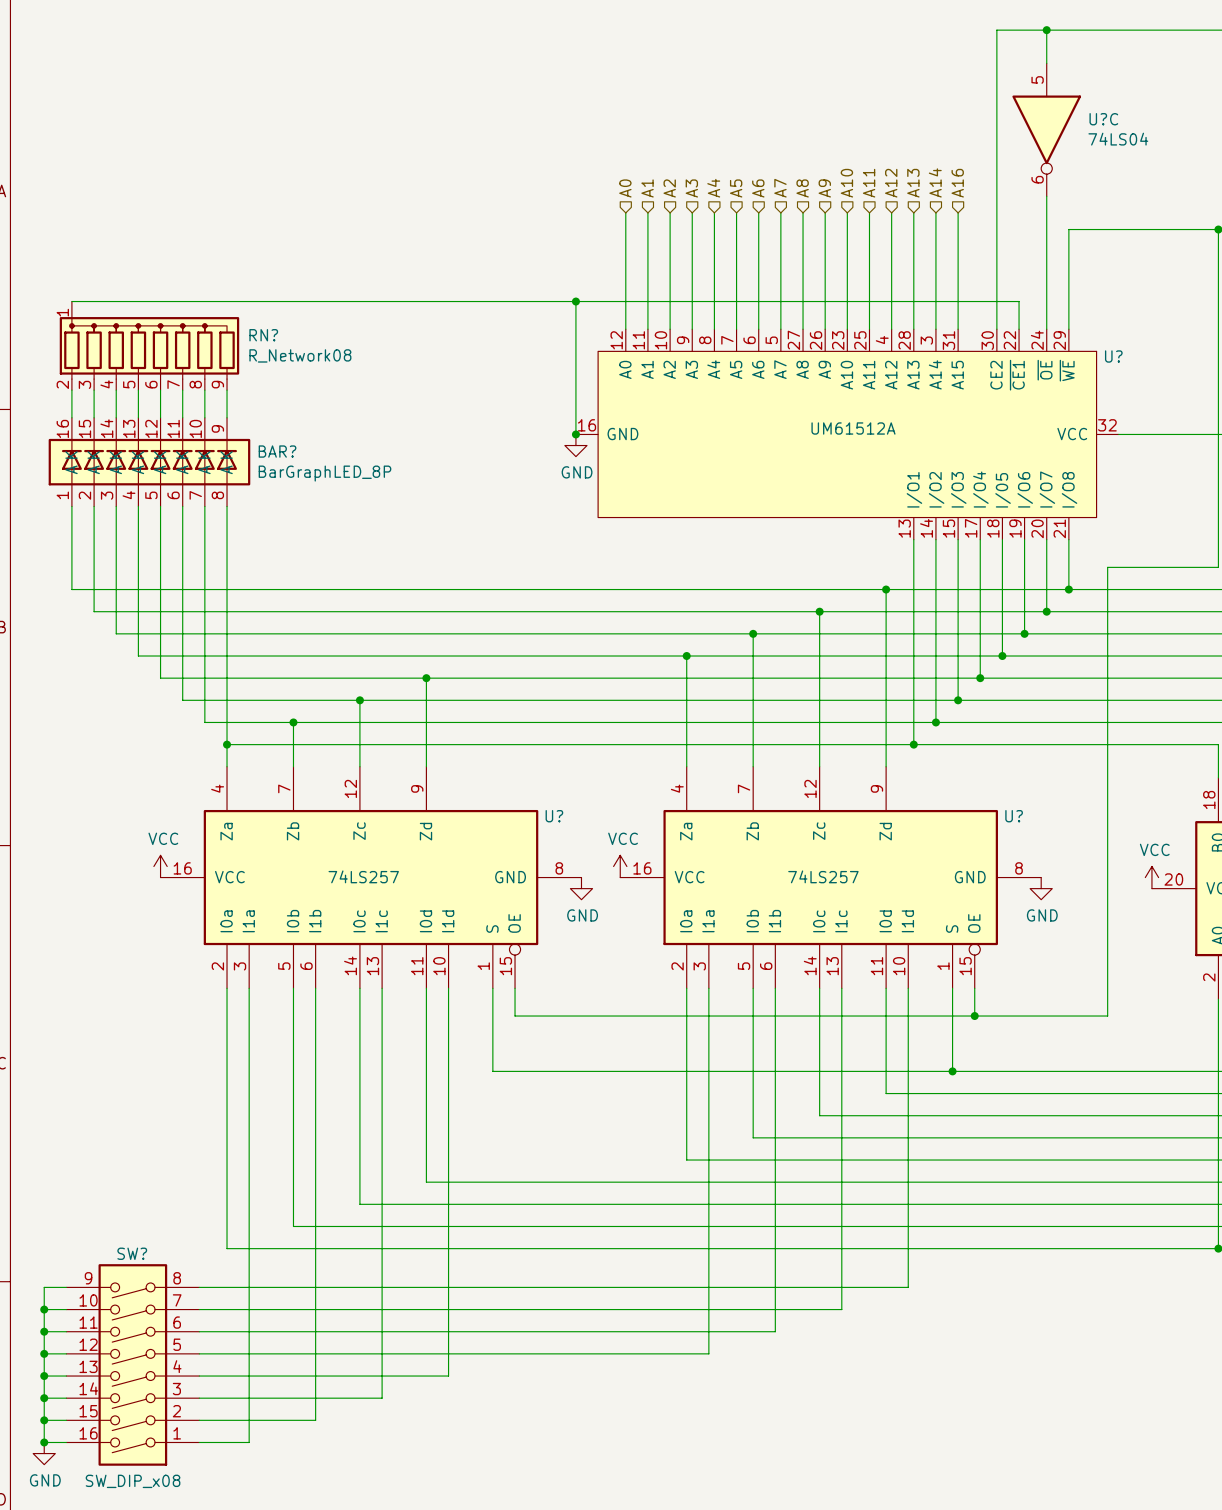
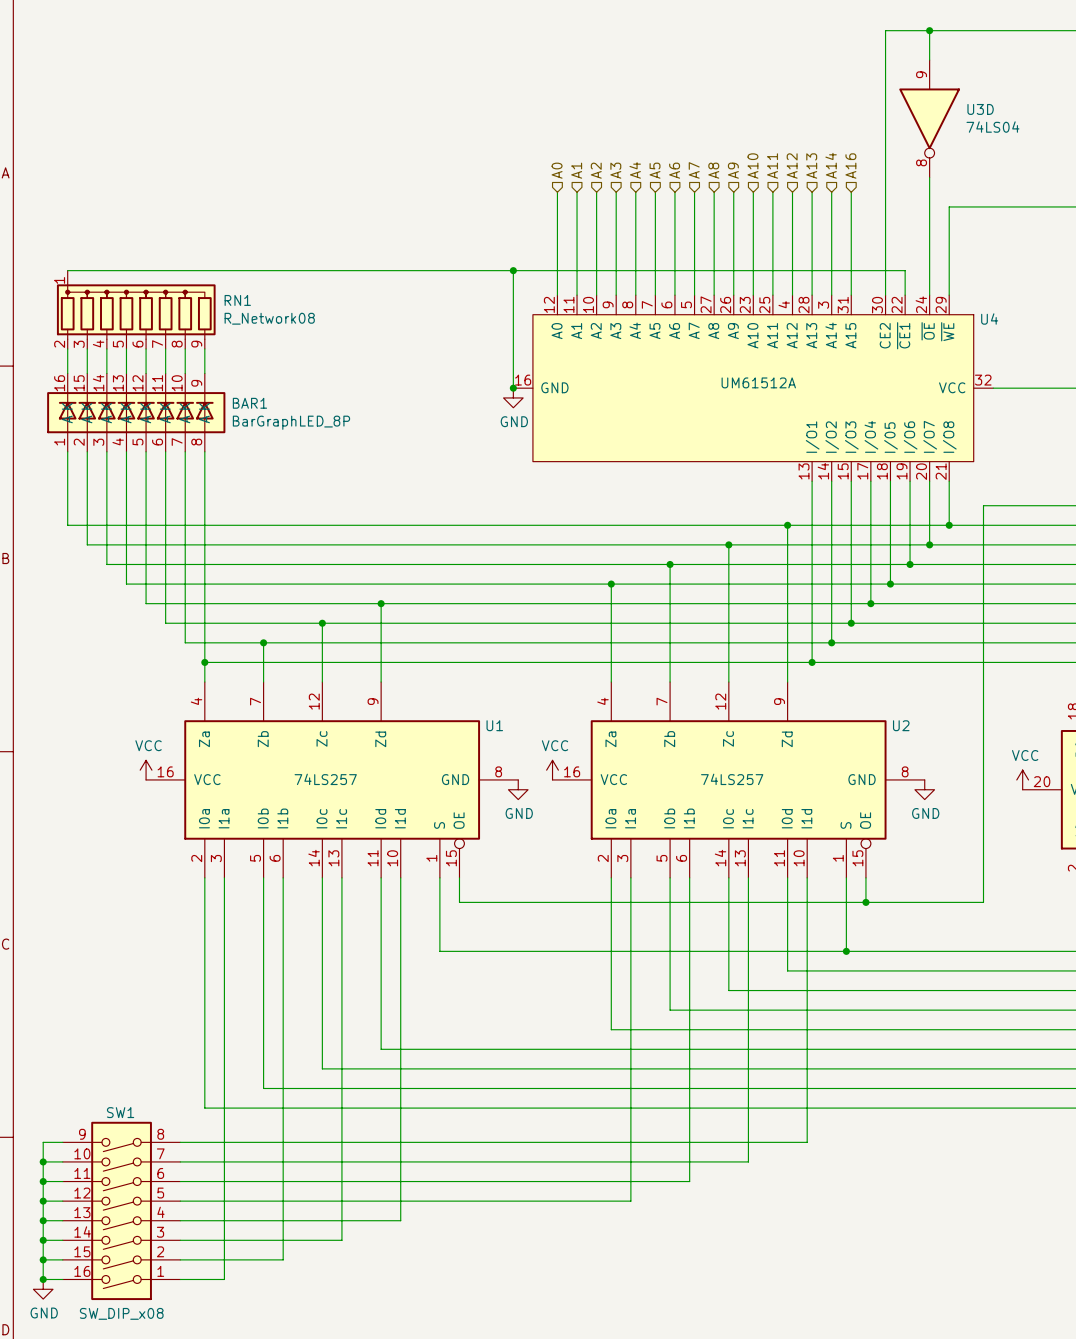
U?C pin number: 5 (1037, 79) -> 9 (921, 74)
U?C name: U?C (1103, 119) -> U3D (980, 109)
U?C pin number: 6 (1037, 179) -> 8 (921, 162)
RN? name: RN? (263, 335) -> RN1 (237, 300)
U? name: U? (1113, 356) -> U4 (989, 319)
BAR? name: BAR? (277, 451) -> BAR1 (249, 403)
U? name: U? (554, 816) -> U1 (494, 725)
U? name: U? (1014, 816) -> U2 (901, 725)
SW? name: SW? (132, 1253) -> SW1 (120, 1112)

